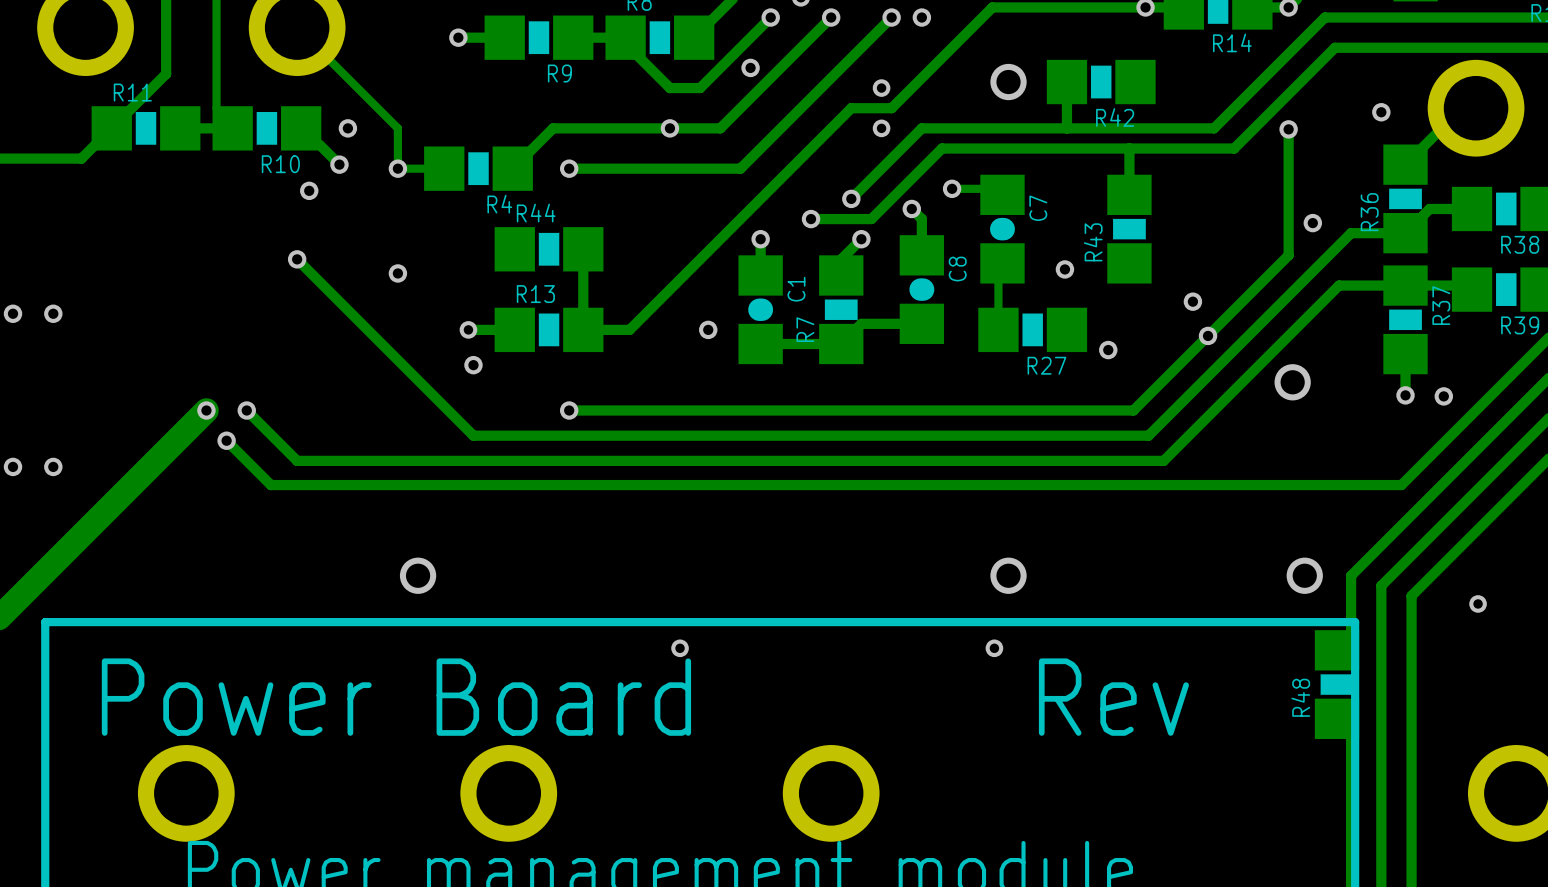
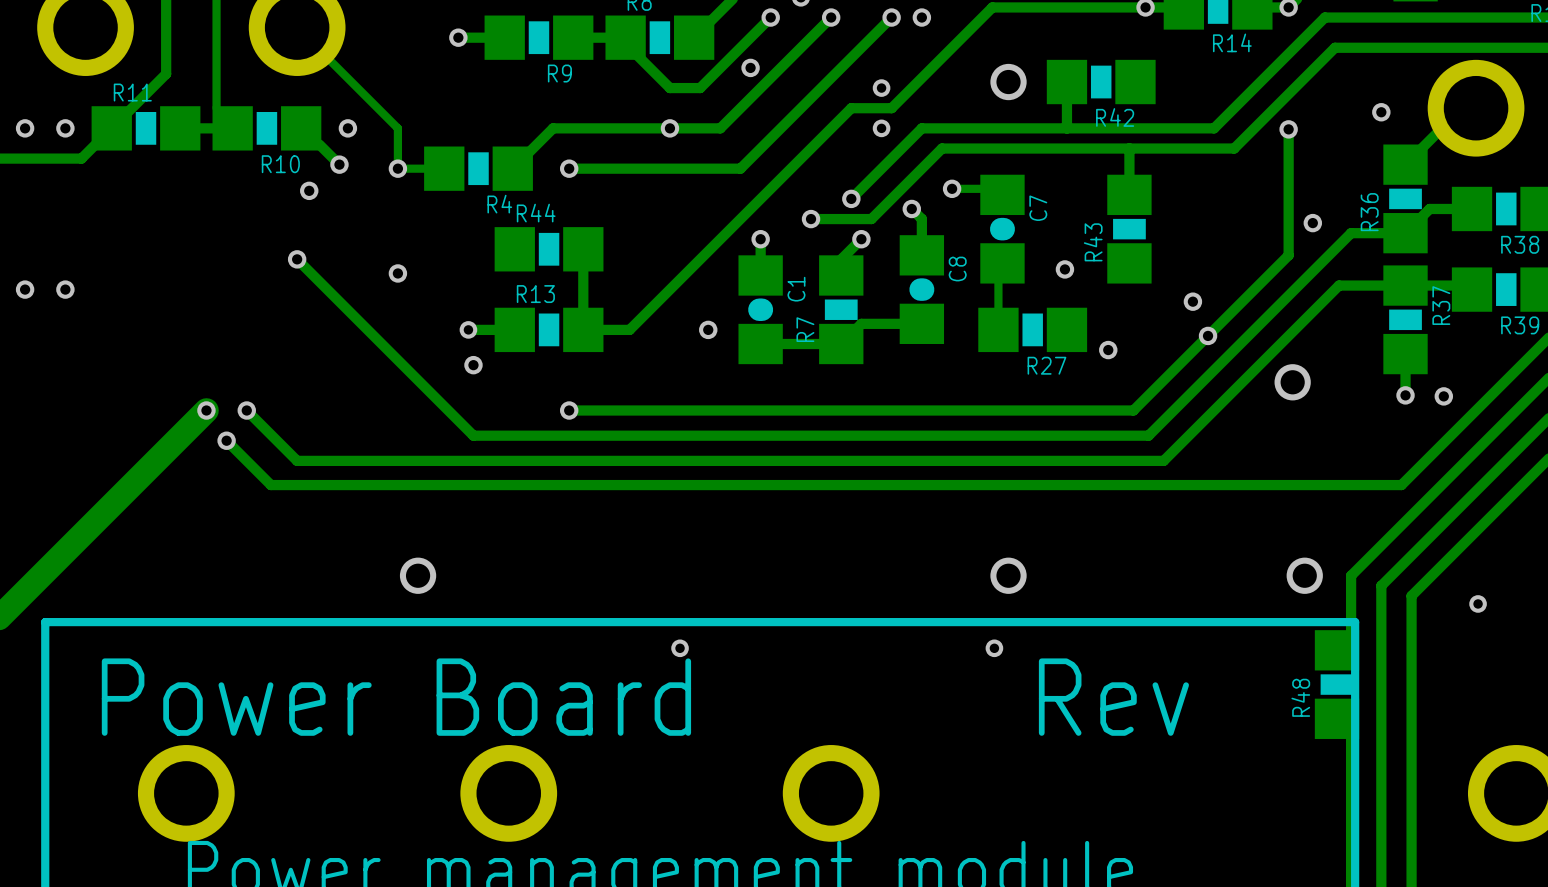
via: none -> (25, 128)
via: none -> (65, 128)
via: none -> (25, 289)
via: none -> (65, 289)
via: (13, 313) -> none
via: (53, 313) -> none
via: (13, 466) -> none
via: (53, 466) -> none

